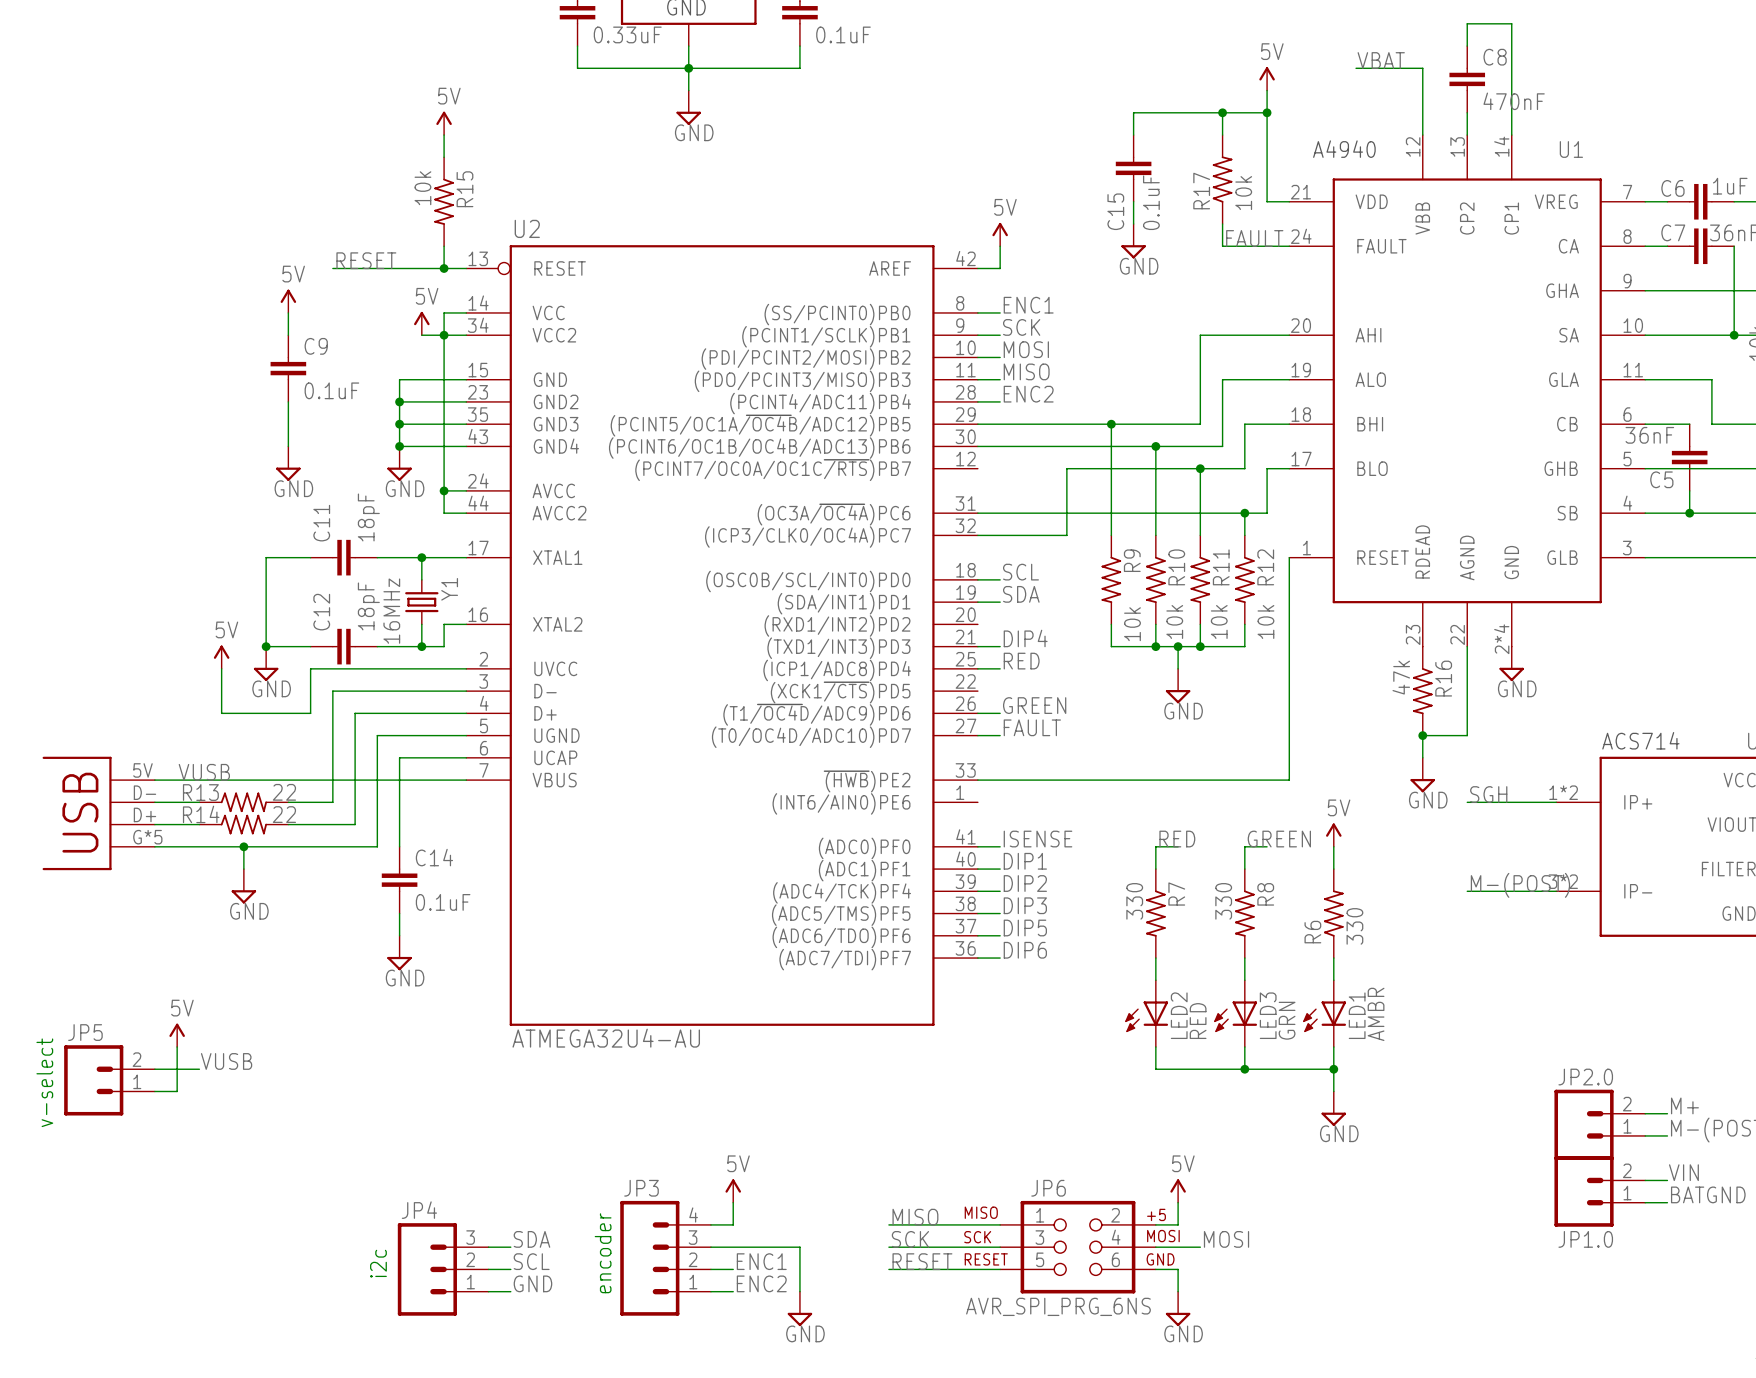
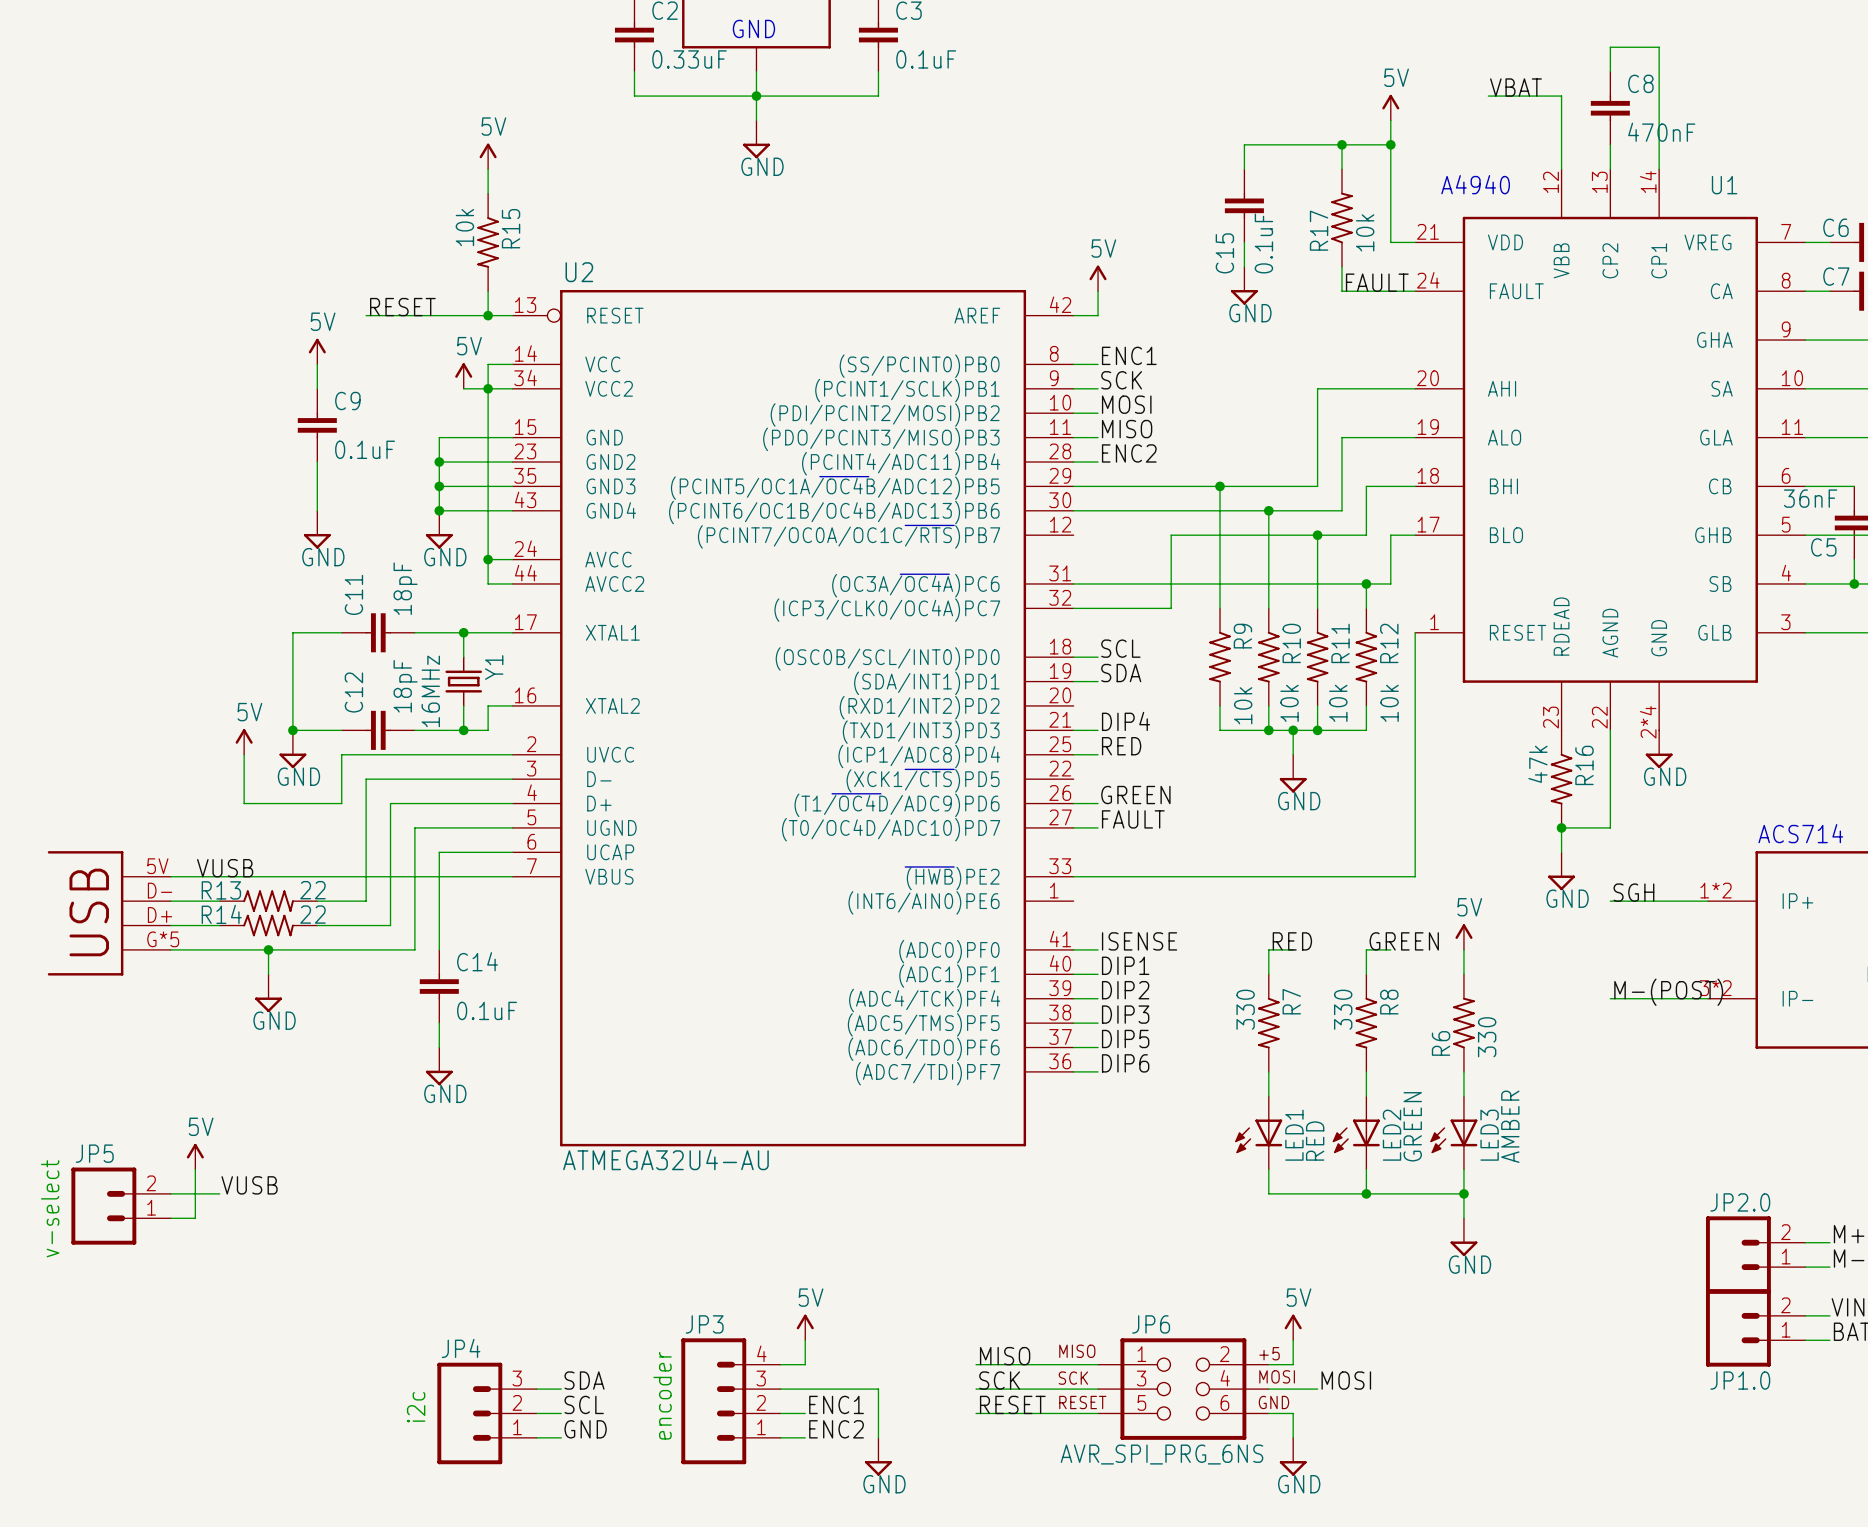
LED1 value: AMBR (1376, 1014) -> AMBER (1510, 1126)
LED2 name: LED2 (1179, 1015) -> LED1 (1294, 1135)
LED3 name: LED3 (1268, 1015) -> LED2 (1392, 1135)
LED1 name: LED1 (1357, 1015) -> LED3 (1489, 1135)
LED3 value: GRN (1287, 1020) -> GREEN (1412, 1126)

